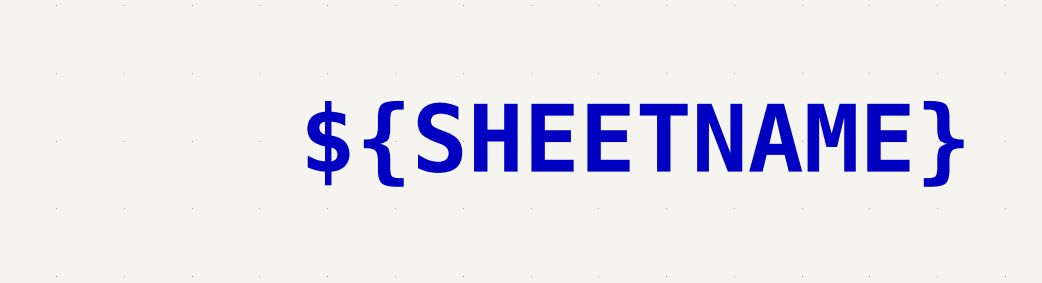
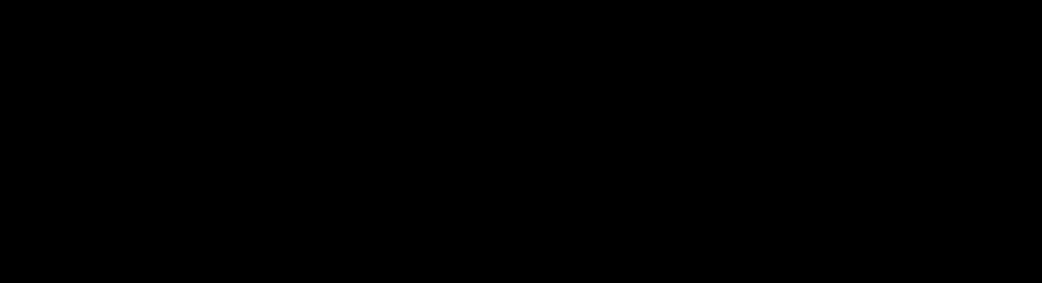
text: ${SHEETNAME} (635, 143) -> none

